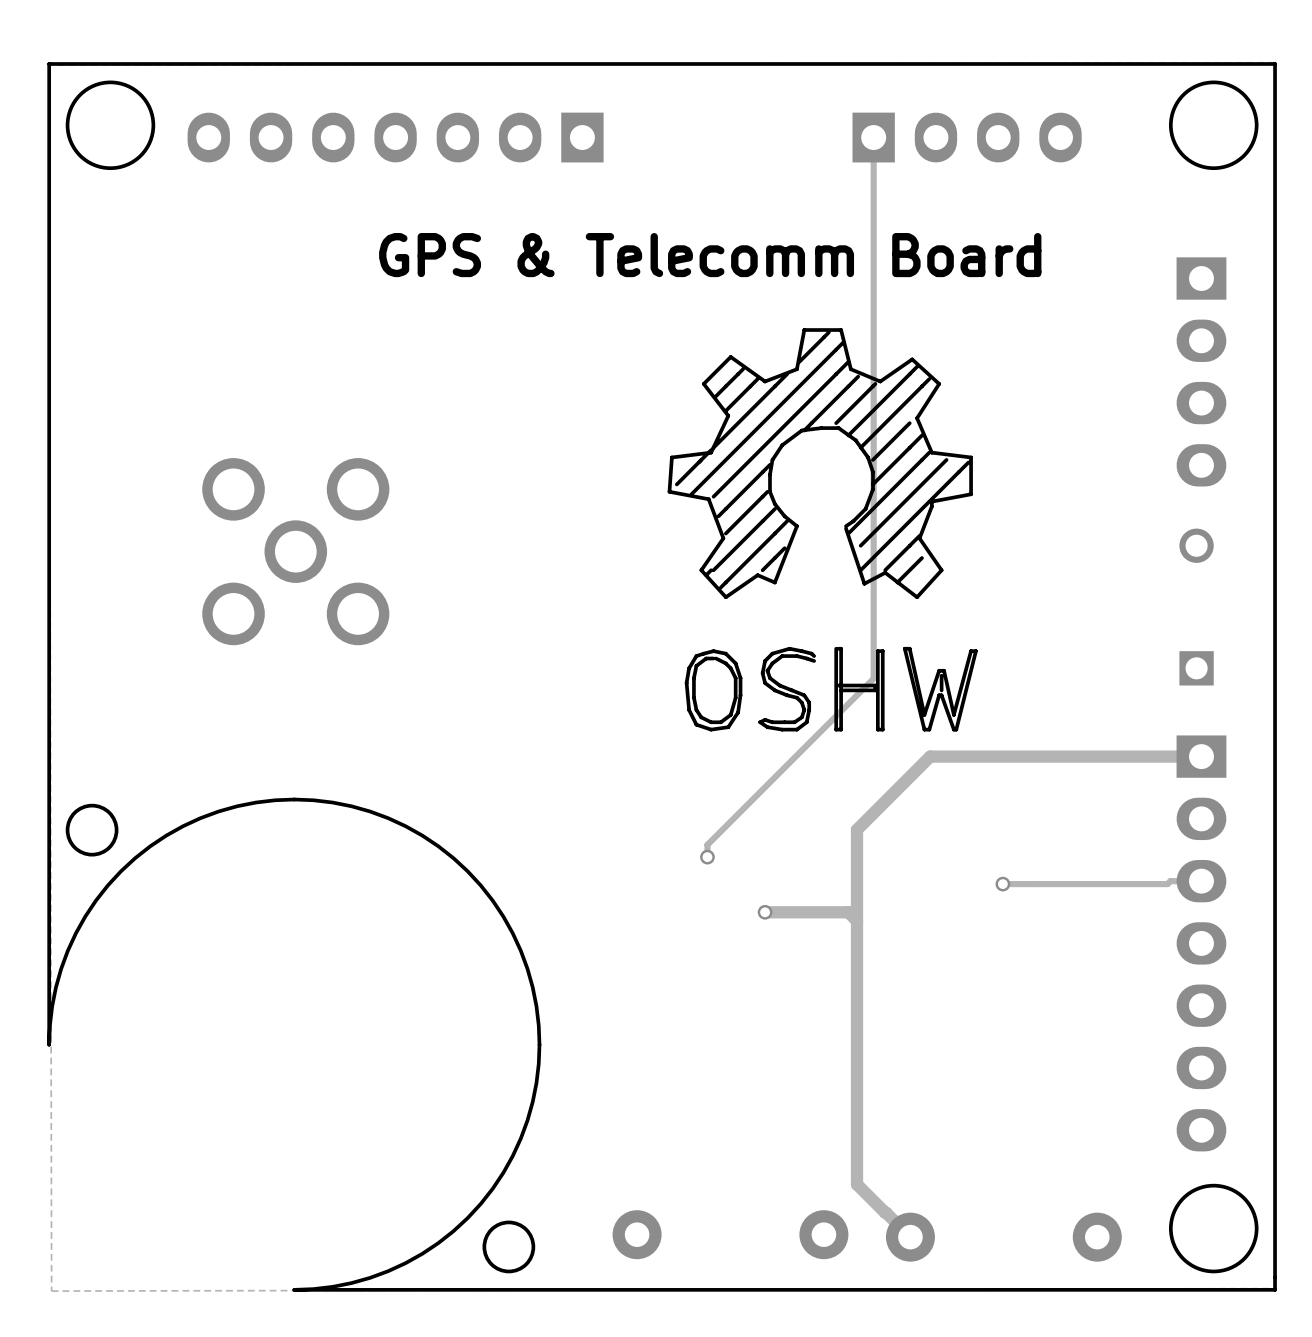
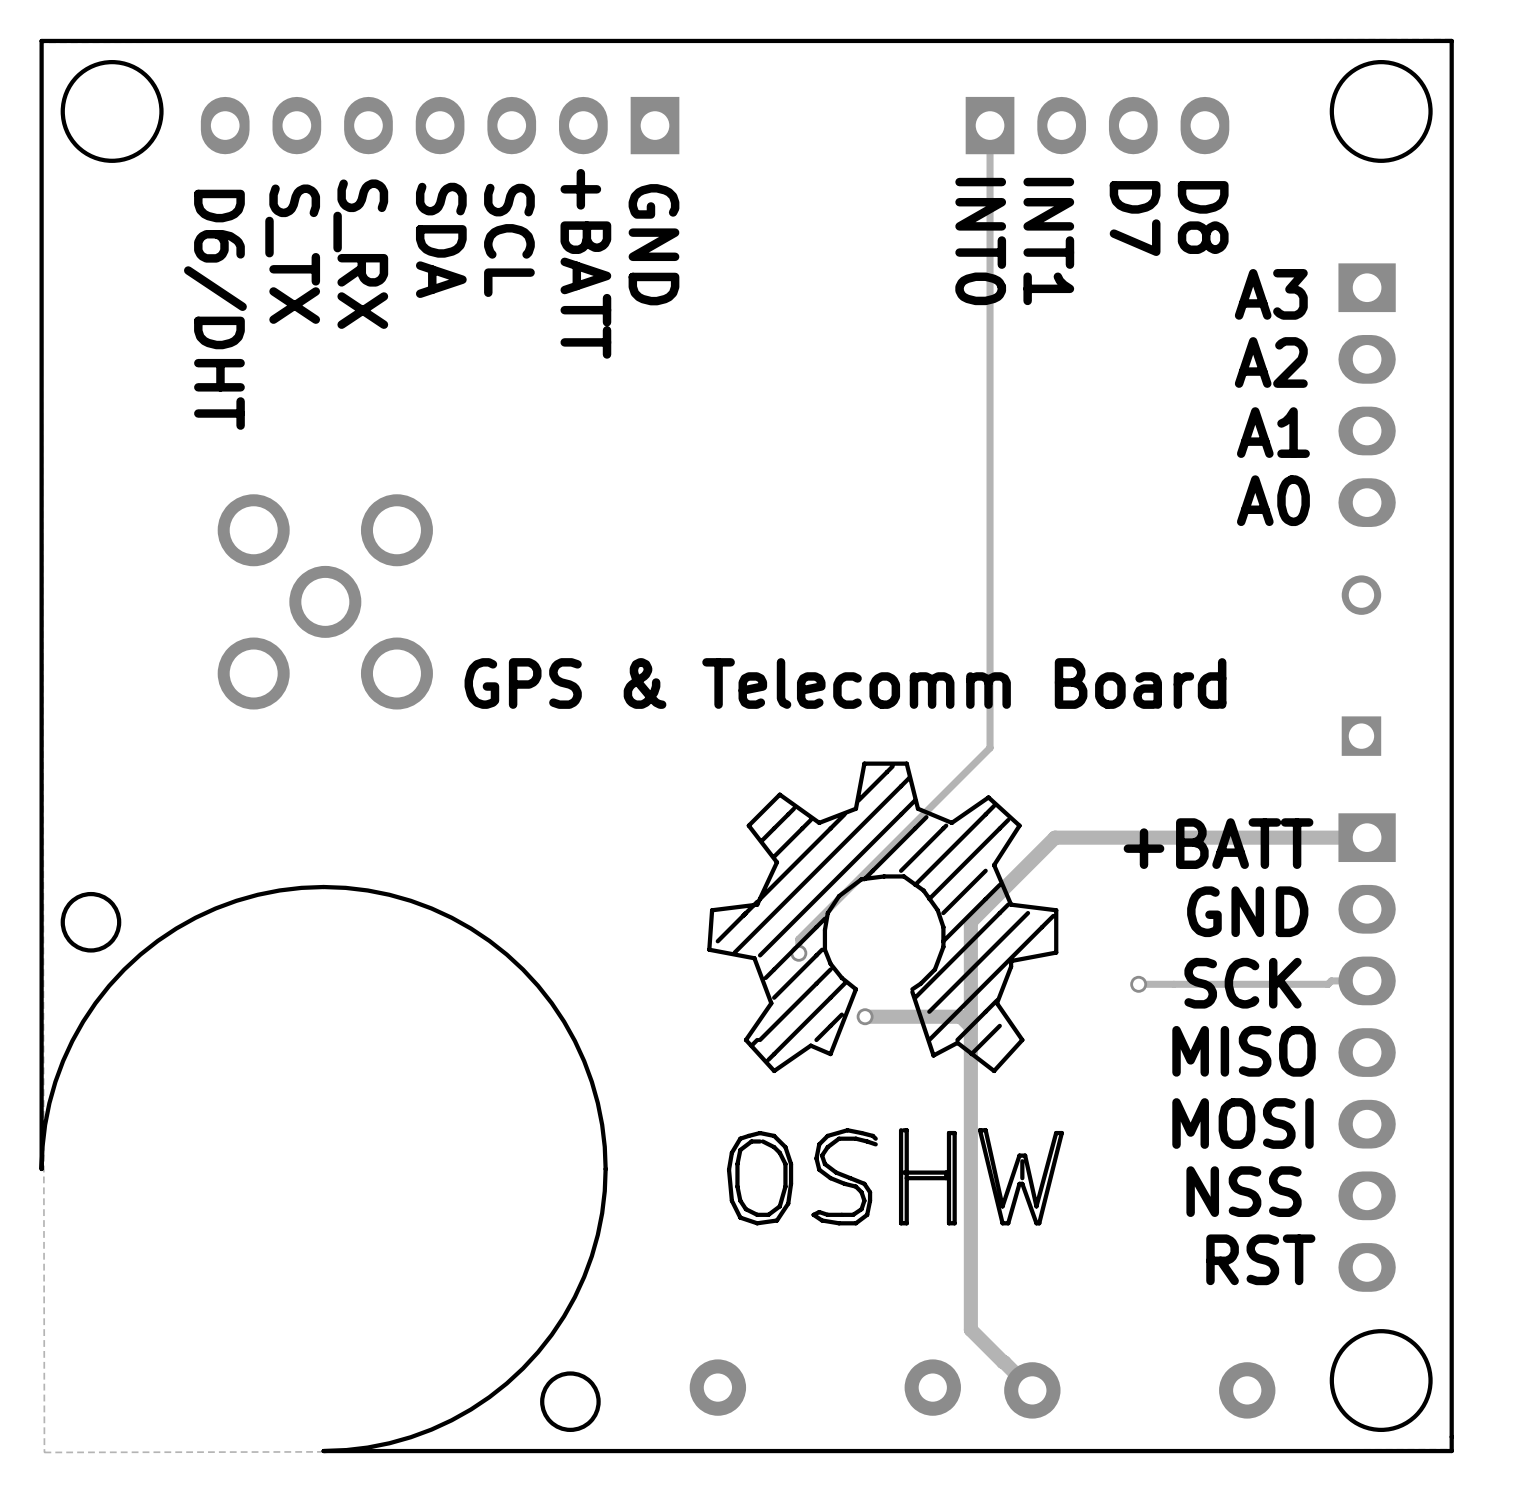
text: none -> D8 (1203, 217)
text: none -> D7 (1135, 218)
text: none -> SDA (441, 240)
text: none -> SCL (509, 240)
text: none -> INT0 (980, 241)
text: none -> INT1 (1048, 241)
text: none -> GND (653, 244)
text: none -> S_TX (292, 254)
text: none -> S_RX (360, 254)
text position: GPS & Telecomm Board (710, 255) -> GPS & Telecomm Board (845, 683)
text: none -> +BATT (585, 263)
text: none -> A3 (1271, 294)
text: none -> D6/DHT (215, 309)
text: none -> A2 (1271, 362)
text: none -> A1 (1273, 432)
text: none -> A0 (1273, 500)
drawing position: (822, 529) -> (885, 993)
text: none -> +BATT (1218, 843)
text: none -> GND (1247, 911)
text: none -> SCK (1243, 983)
text: none -> MISO (1244, 1051)
text: none -> MOSI (1243, 1123)
text: none -> NSS (1244, 1191)
text: none -> RST (1260, 1259)

